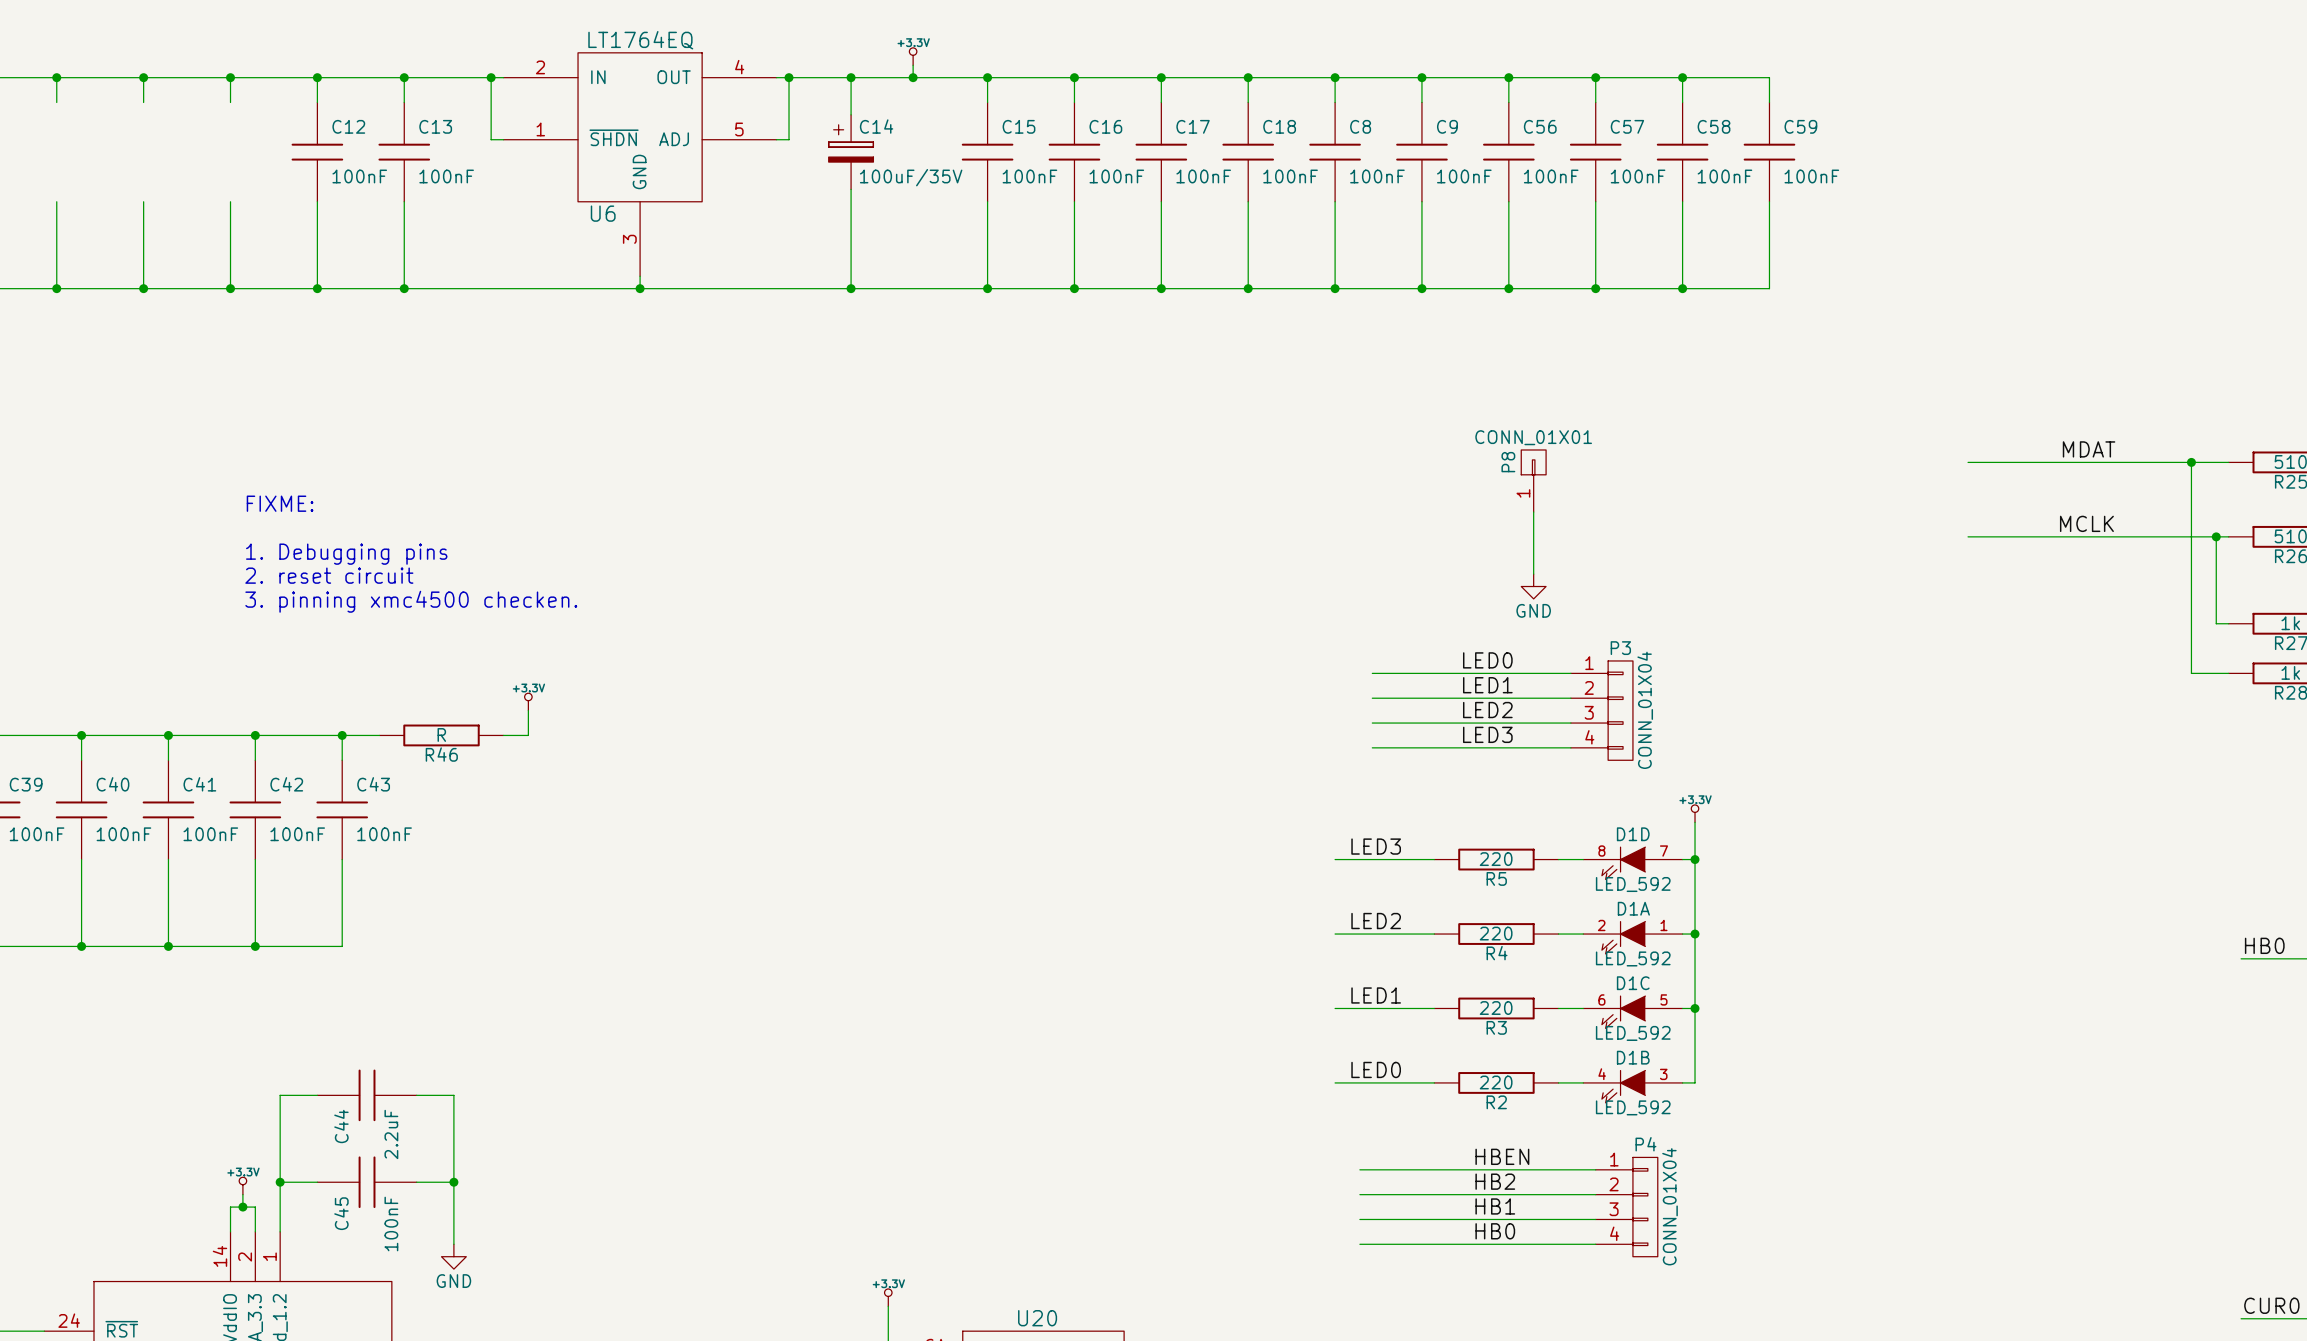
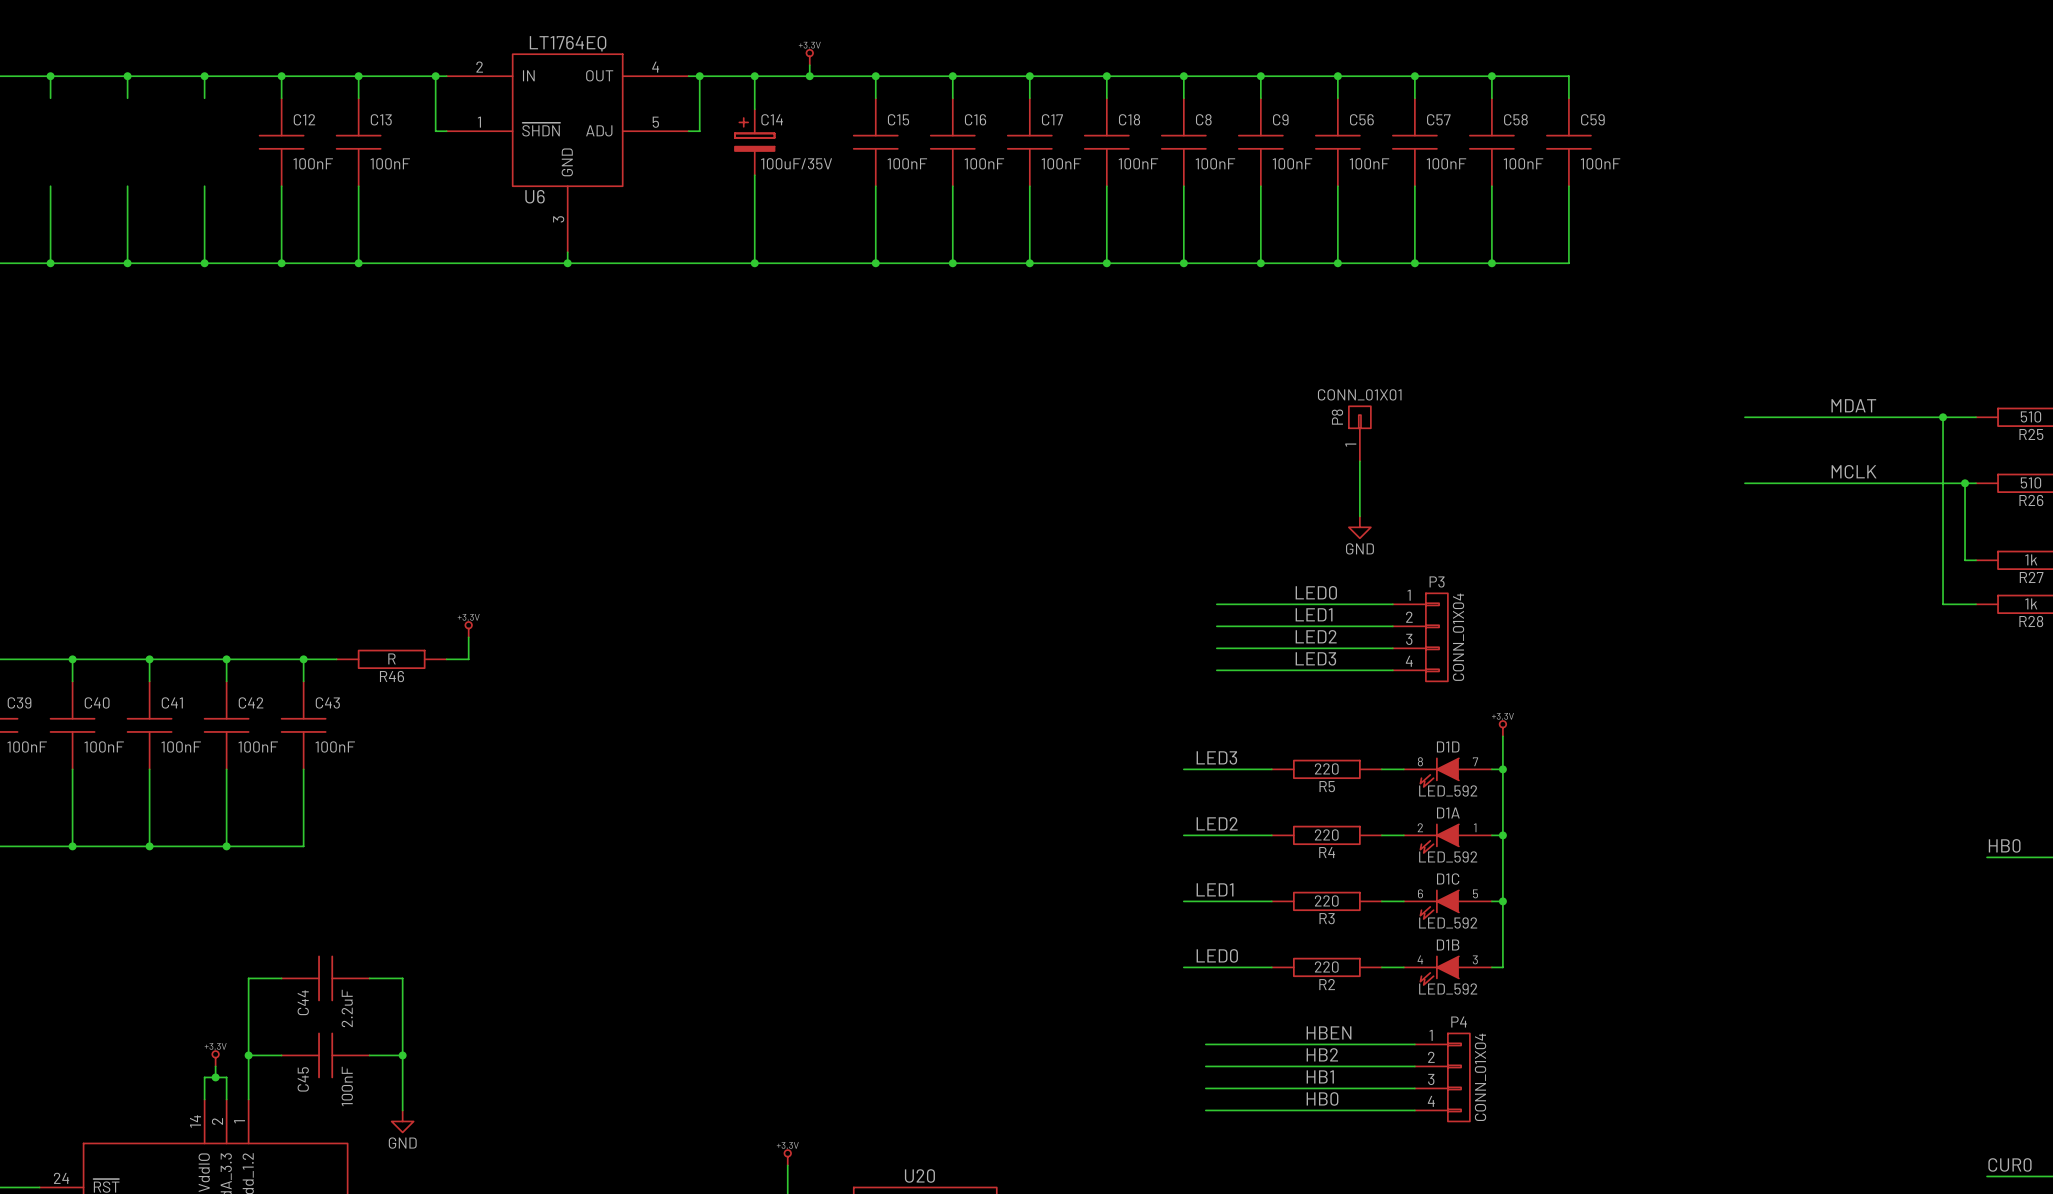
text: FIXME: (280, 503) -> none
text: 1. Debugging pins (346, 554) -> none
text: 2. reset circuit (329, 575) -> none
text: 3. pinning xmc4500 checken. (411, 601) -> none

